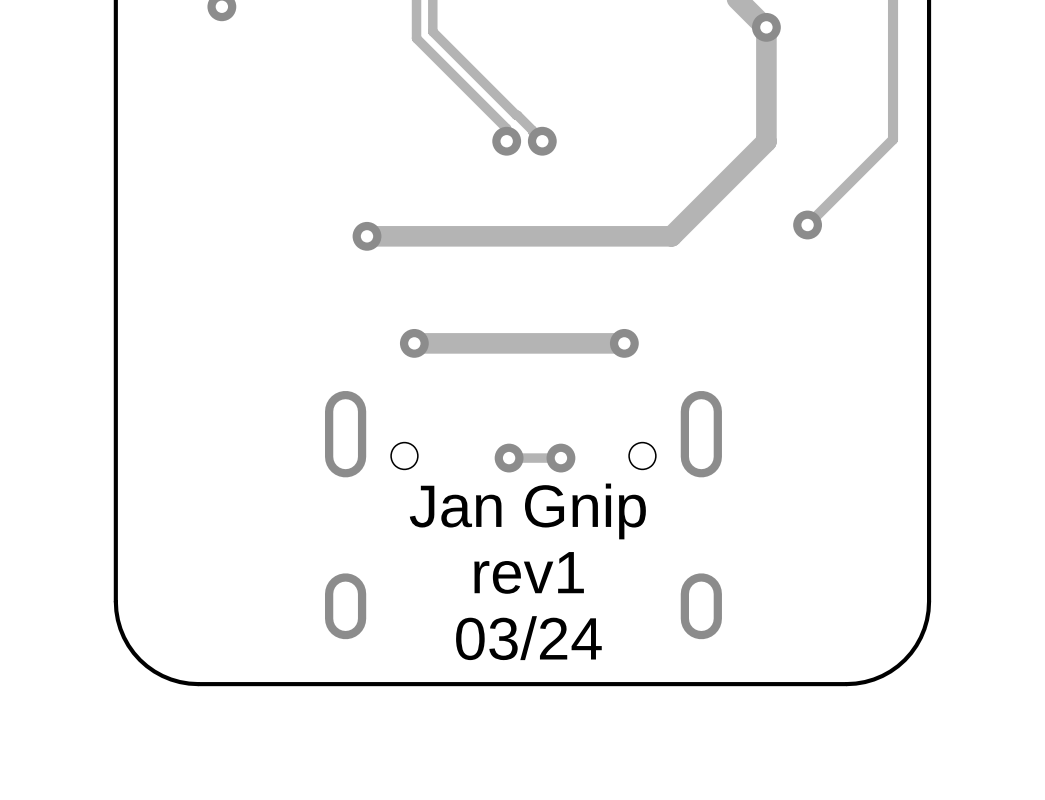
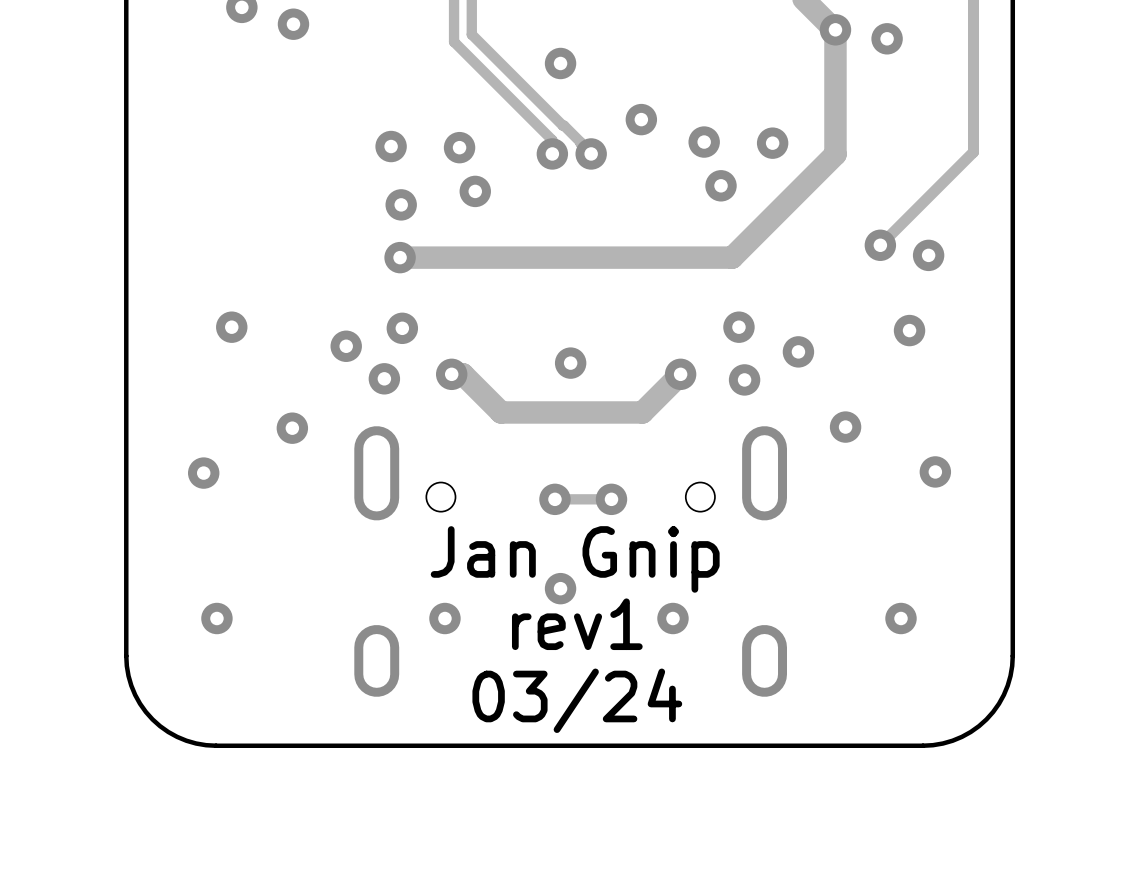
via: none -> (293, 24)
via: none -> (887, 38)
via: none -> (560, 63)
via: none -> (641, 119)
via: none -> (704, 142)
via: none -> (772, 143)
via: none -> (391, 146)
via: none -> (459, 147)
via: none -> (721, 185)
via: none -> (475, 191)
via: none -> (401, 204)
via: none -> (928, 255)
via: none -> (231, 327)
via: none -> (738, 327)
via: none -> (402, 328)
via: none -> (909, 330)
via: none -> (346, 346)
via: none -> (798, 351)
via: none -> (570, 363)
track: (624, 343) (424, 343) -> (680, 374) (642, 412) (501, 412) (462, 374)
via: none -> (384, 378)
via: none -> (744, 379)
via: none -> (845, 427)
via: none -> (292, 428)
via: none -> (935, 471)
via: none -> (203, 473)
via: none -> (560, 588)
via: none -> (216, 618)
via: none -> (444, 618)
via: none -> (672, 618)
via: none -> (901, 618)

